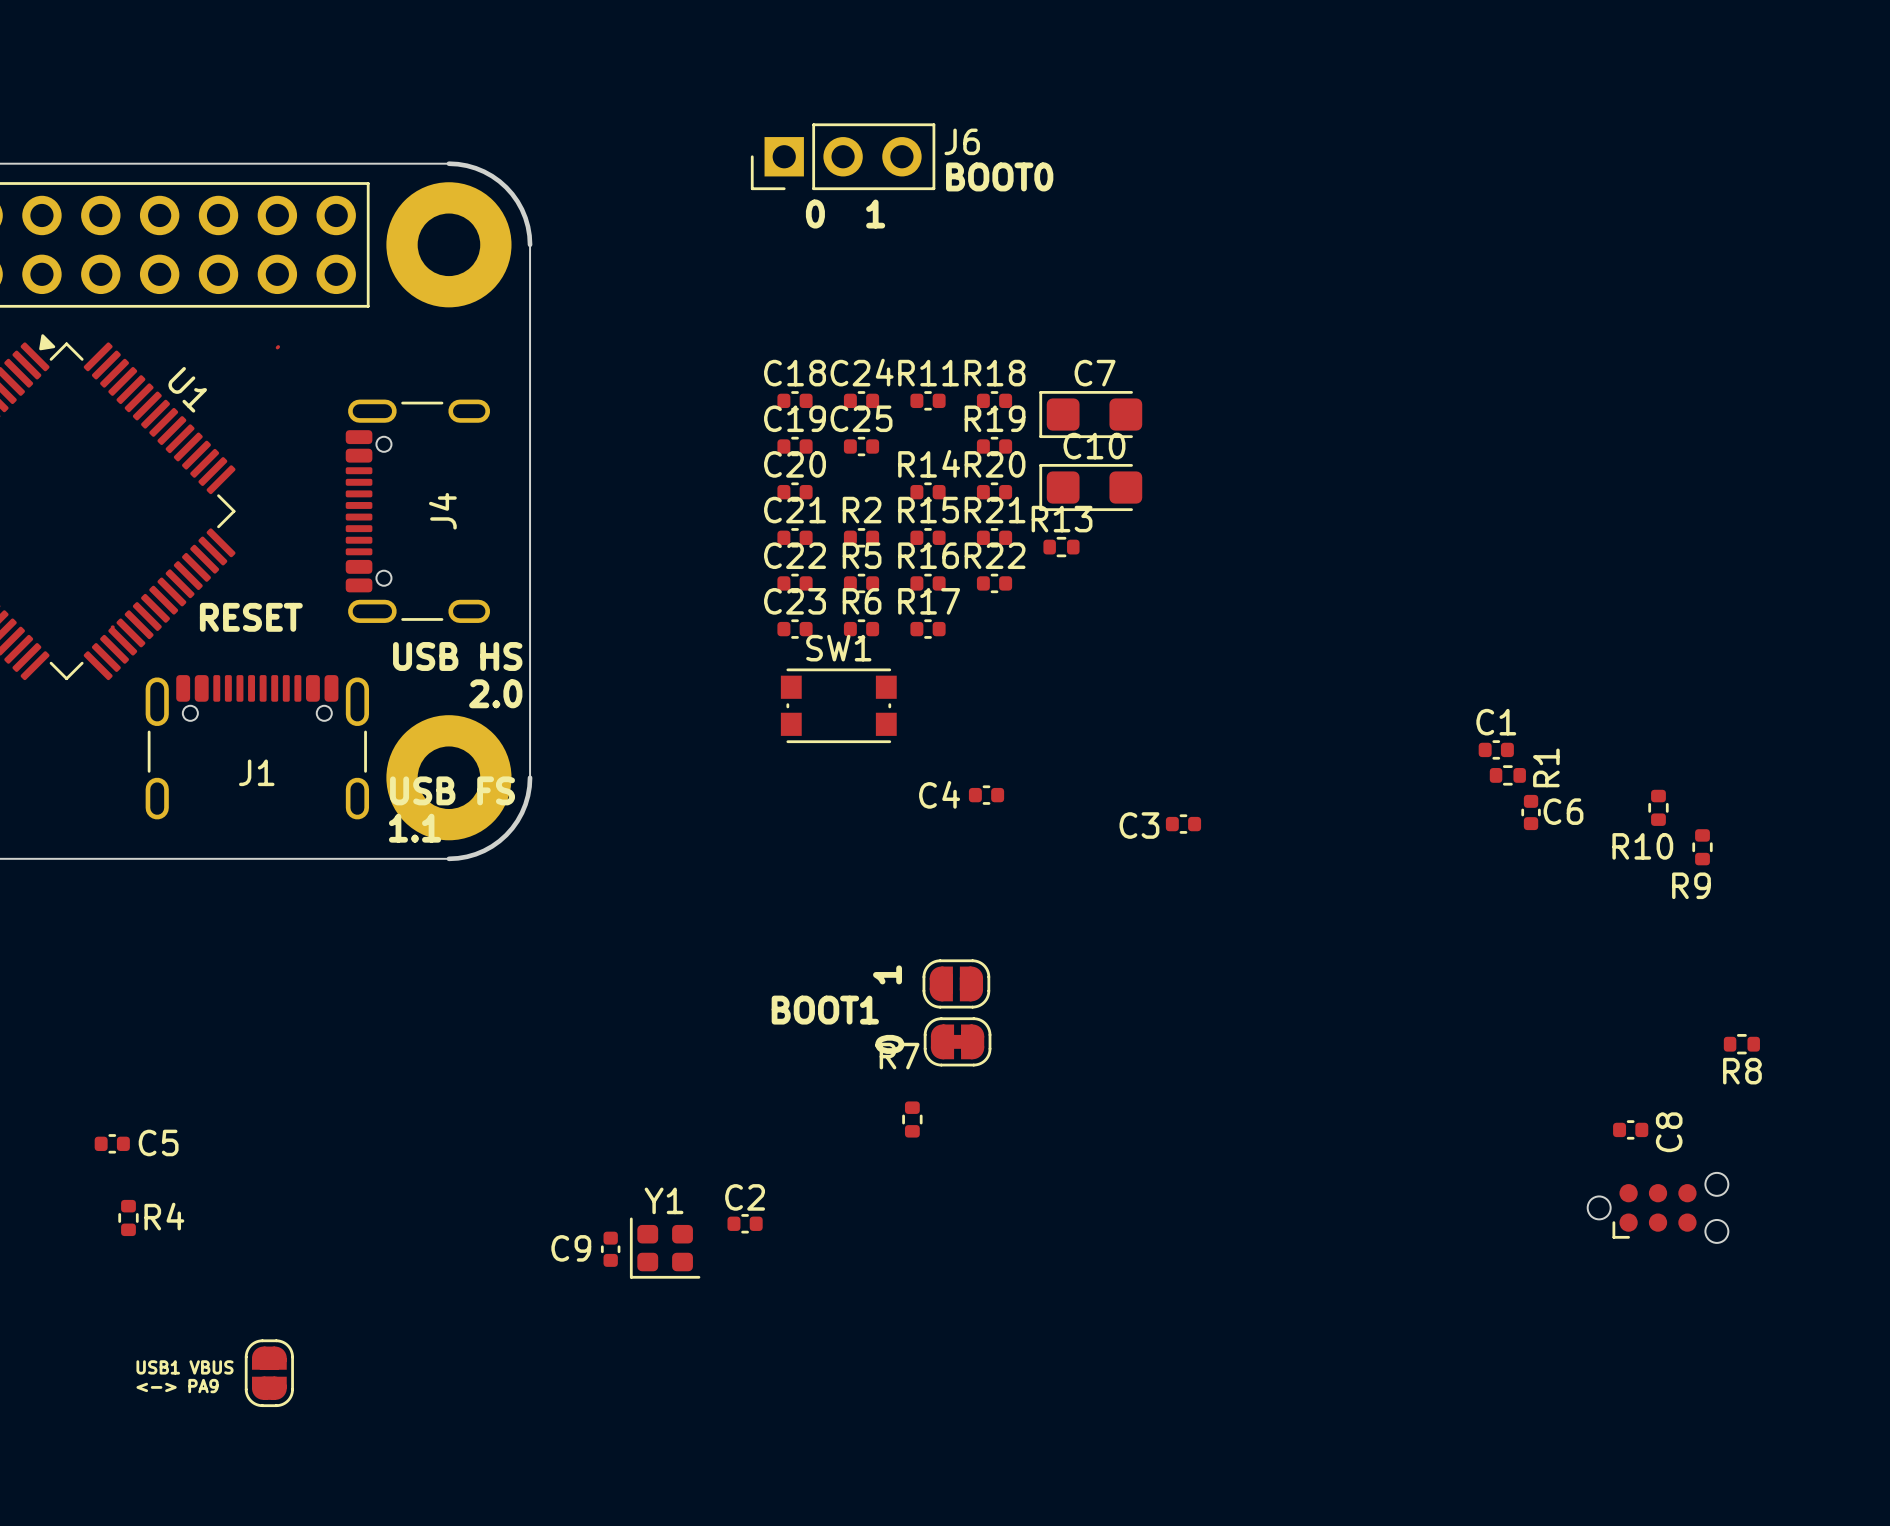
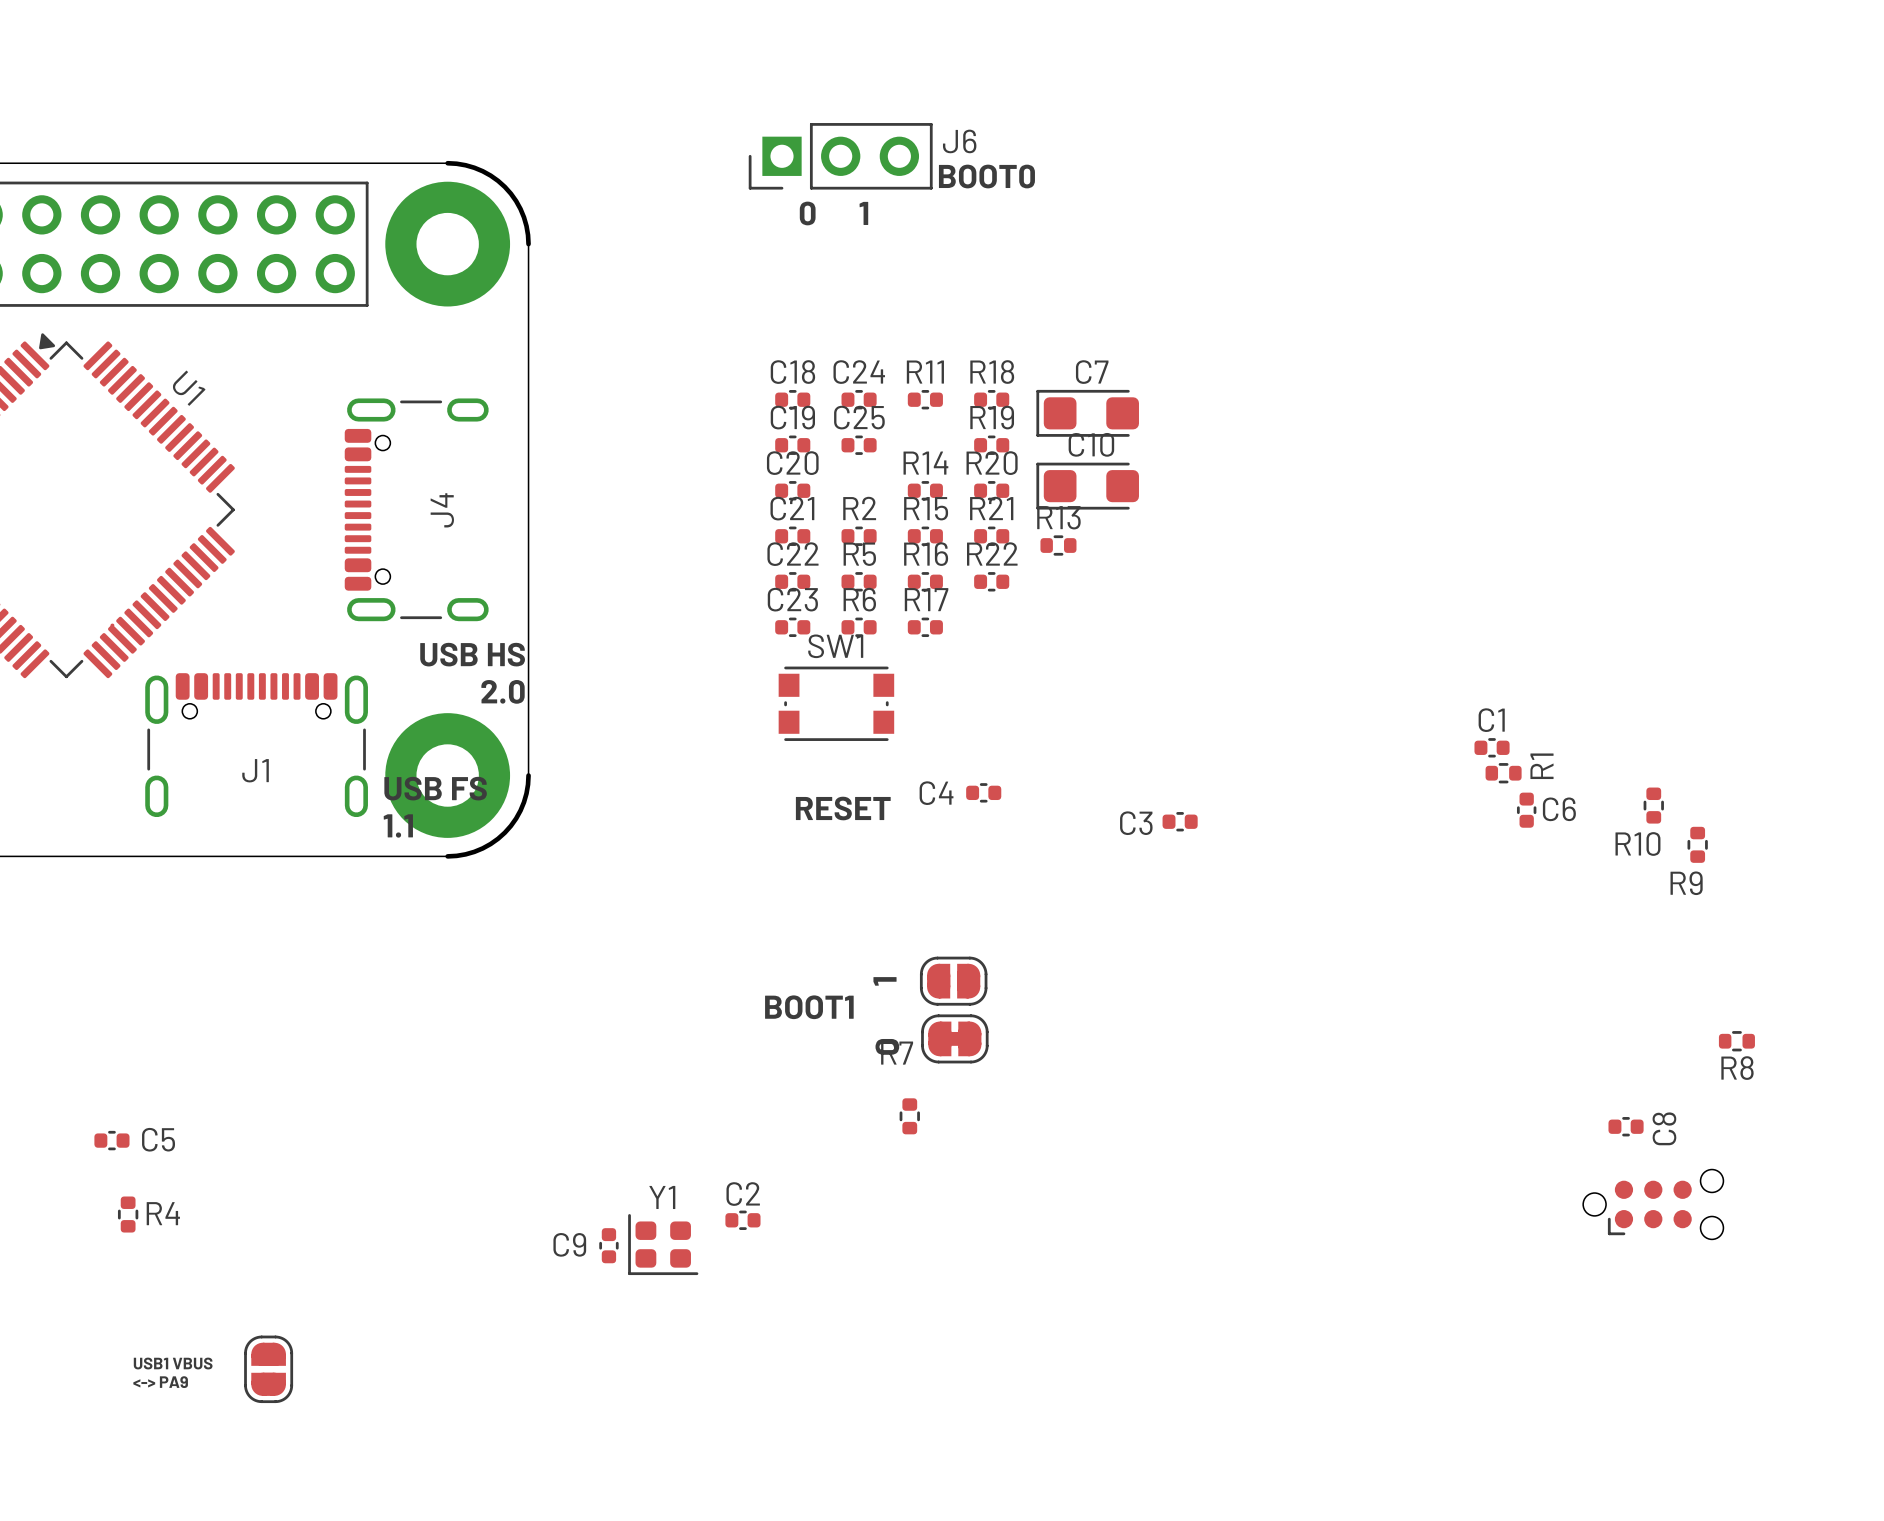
top track: (278, 346) (277, 347) -> none
text: RESET (251, 617) -> none
text: none -> RESET (843, 808)

